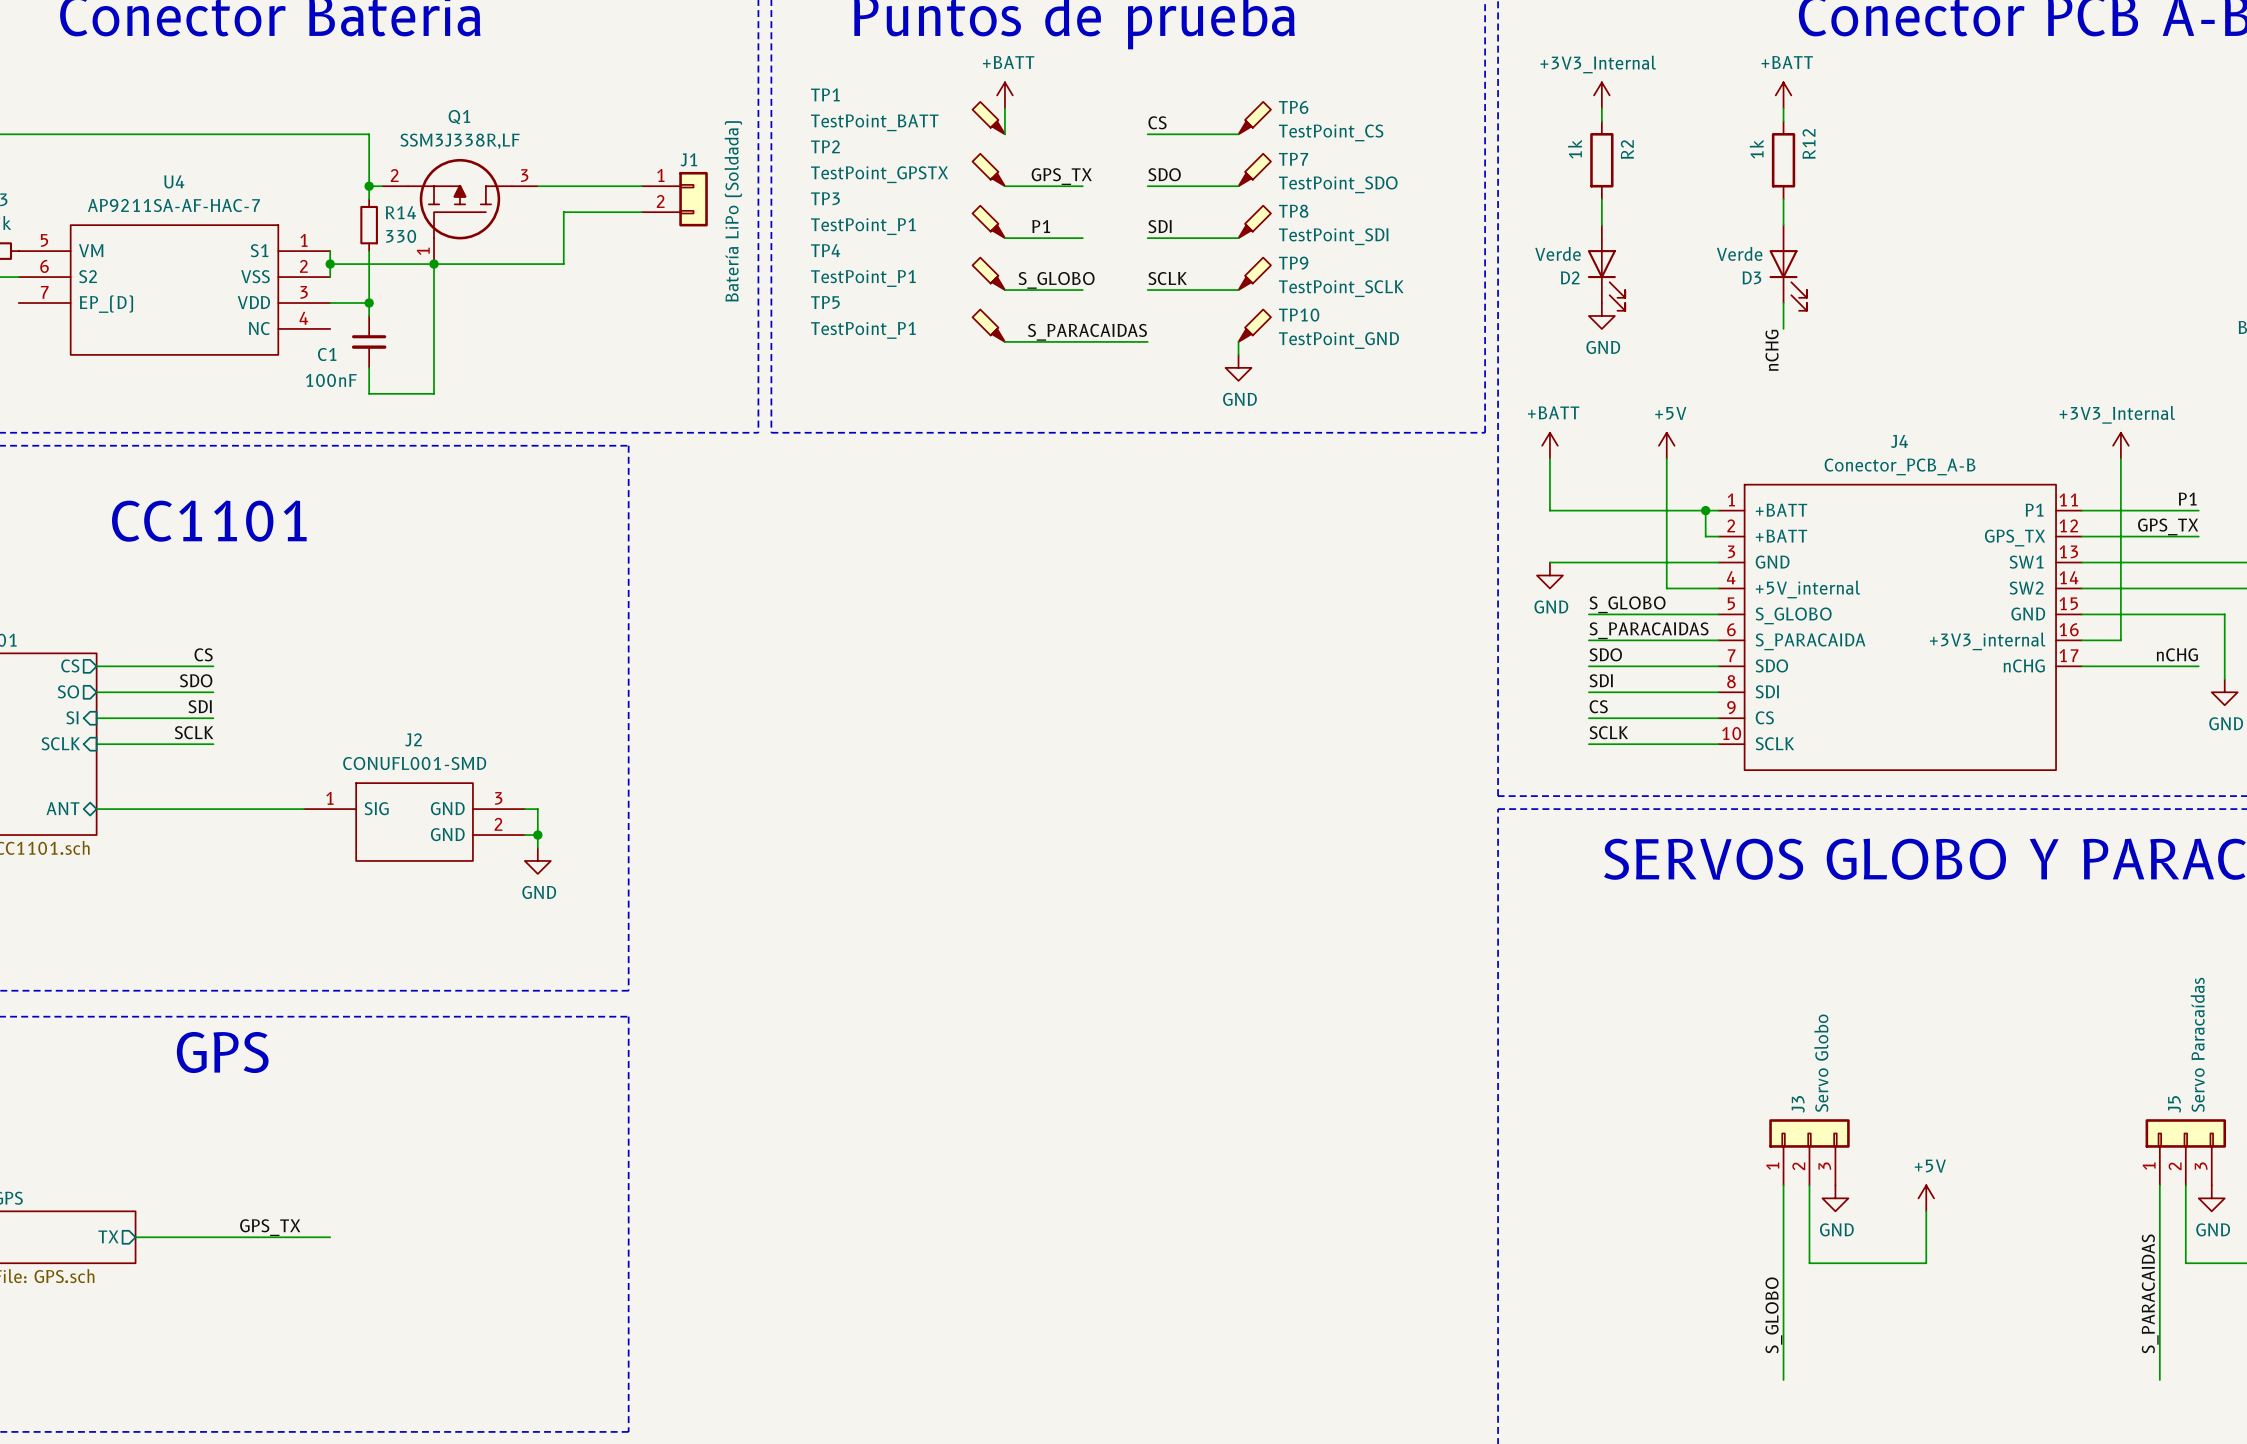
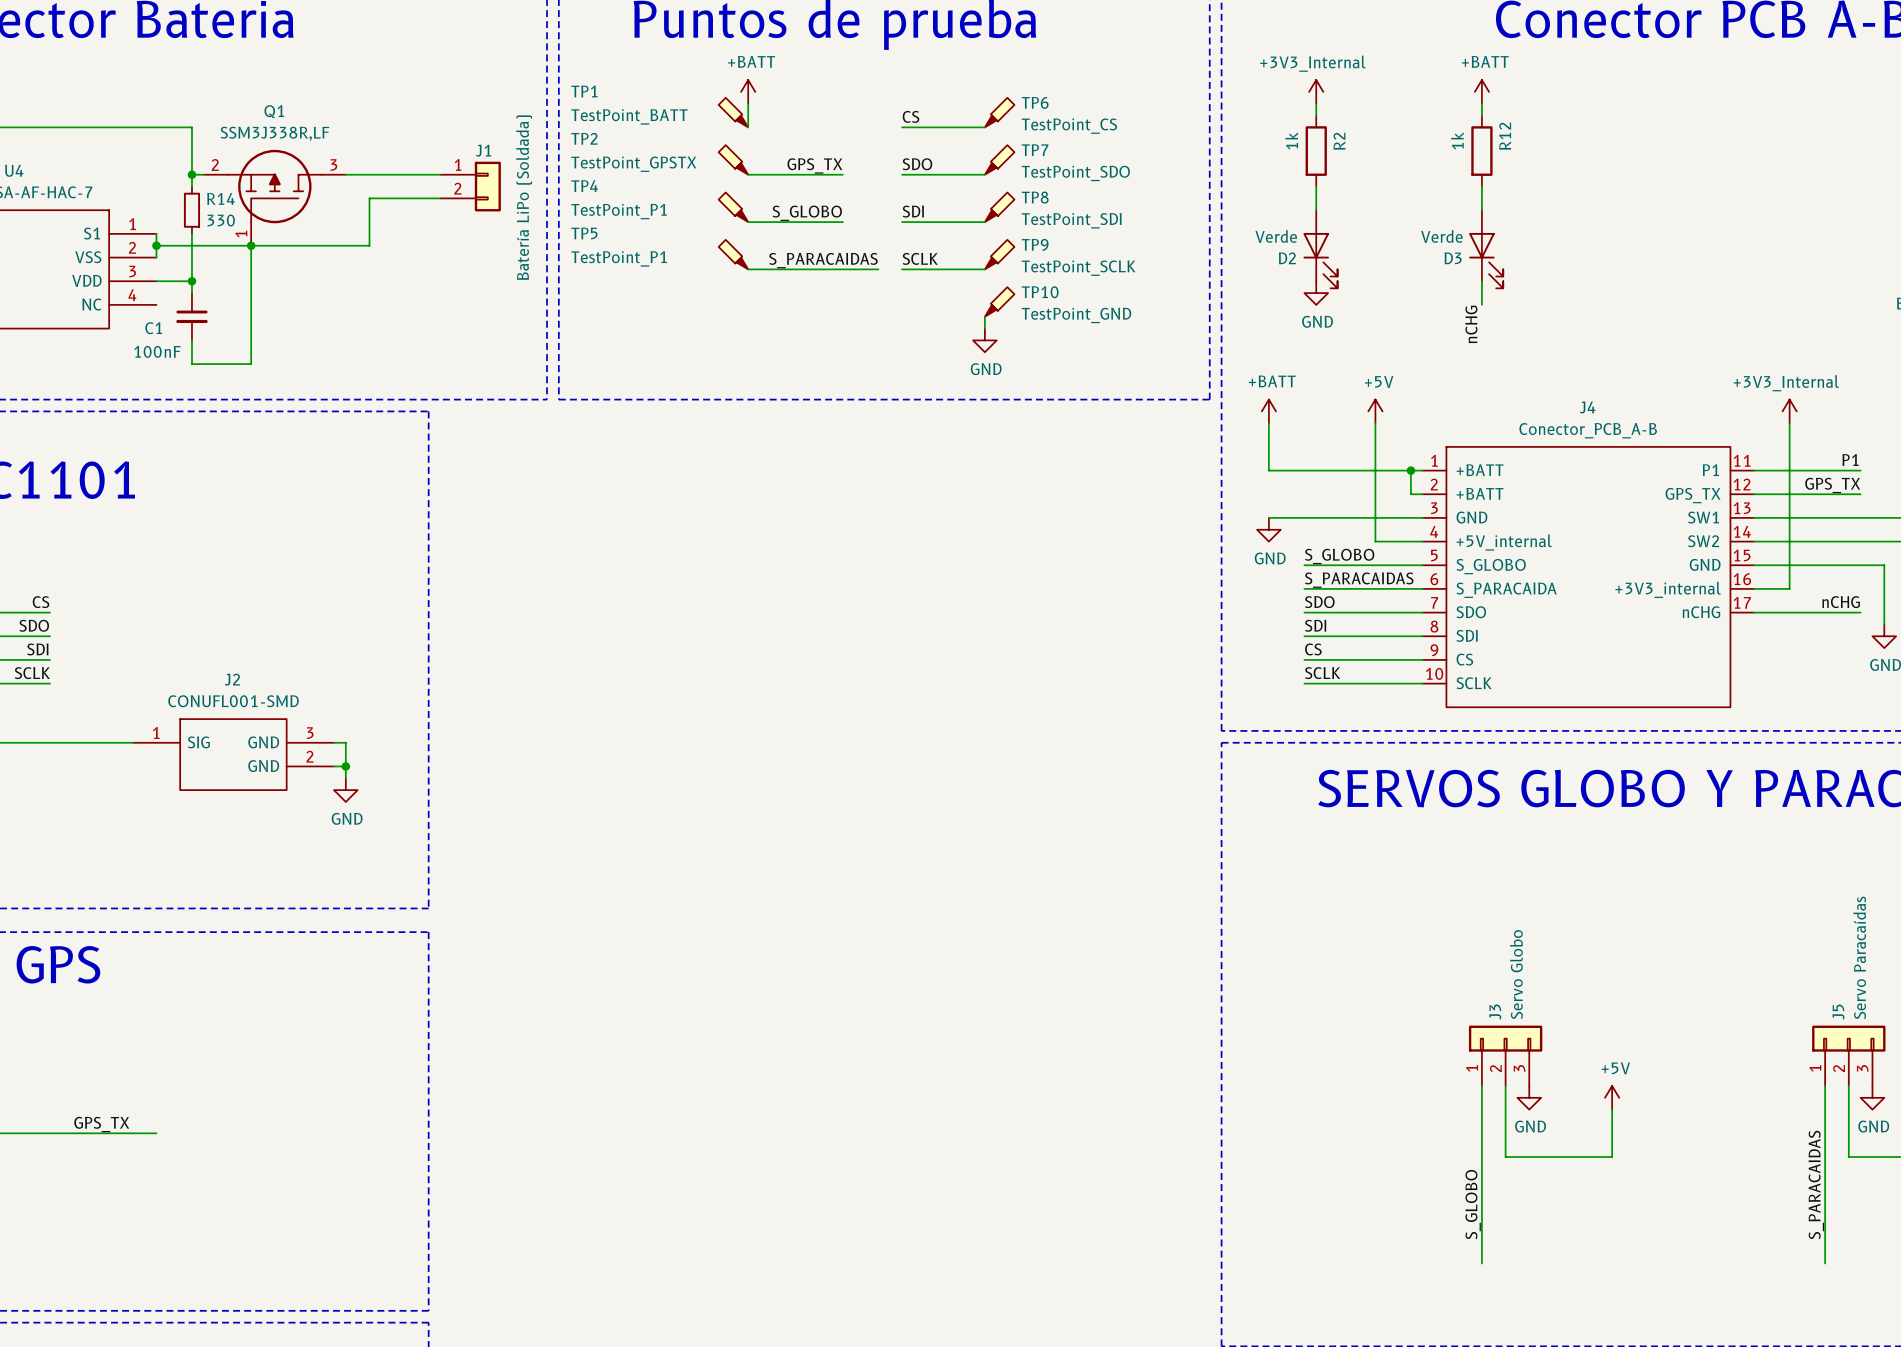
power symbol position: +BATT (1004, 95) -> +BATT (748, 91)
wire: (1004, 108) (1004, 134) -> (748, 103) (748, 127)
TP1 position: (988, 118) -> (733, 112)
TP2 position: (988, 169) -> (733, 159)
label position: GPS_TX (1061, 176) -> GPS_TX (814, 165)
wire: none -> (748, 174) (771, 174)
TP3: TestPoint_P1 (988, 221) -> none
label: P1 (1041, 226) -> none
wire: none -> (748, 222) (771, 222)
TP4 position: (988, 273) -> (733, 207)
label position: S_GLOBO (1056, 280) -> S_GLOBO (807, 213)
wire: none -> (748, 269) (771, 269)
wire: none -> (842, 269) (878, 269)
TP5 position: (988, 325) -> (733, 254)
label position: S_PARACAIDAS (1087, 332) -> S_PARACAIDAS (823, 260)
wire: (1004, 341) (1147, 341) -> none

